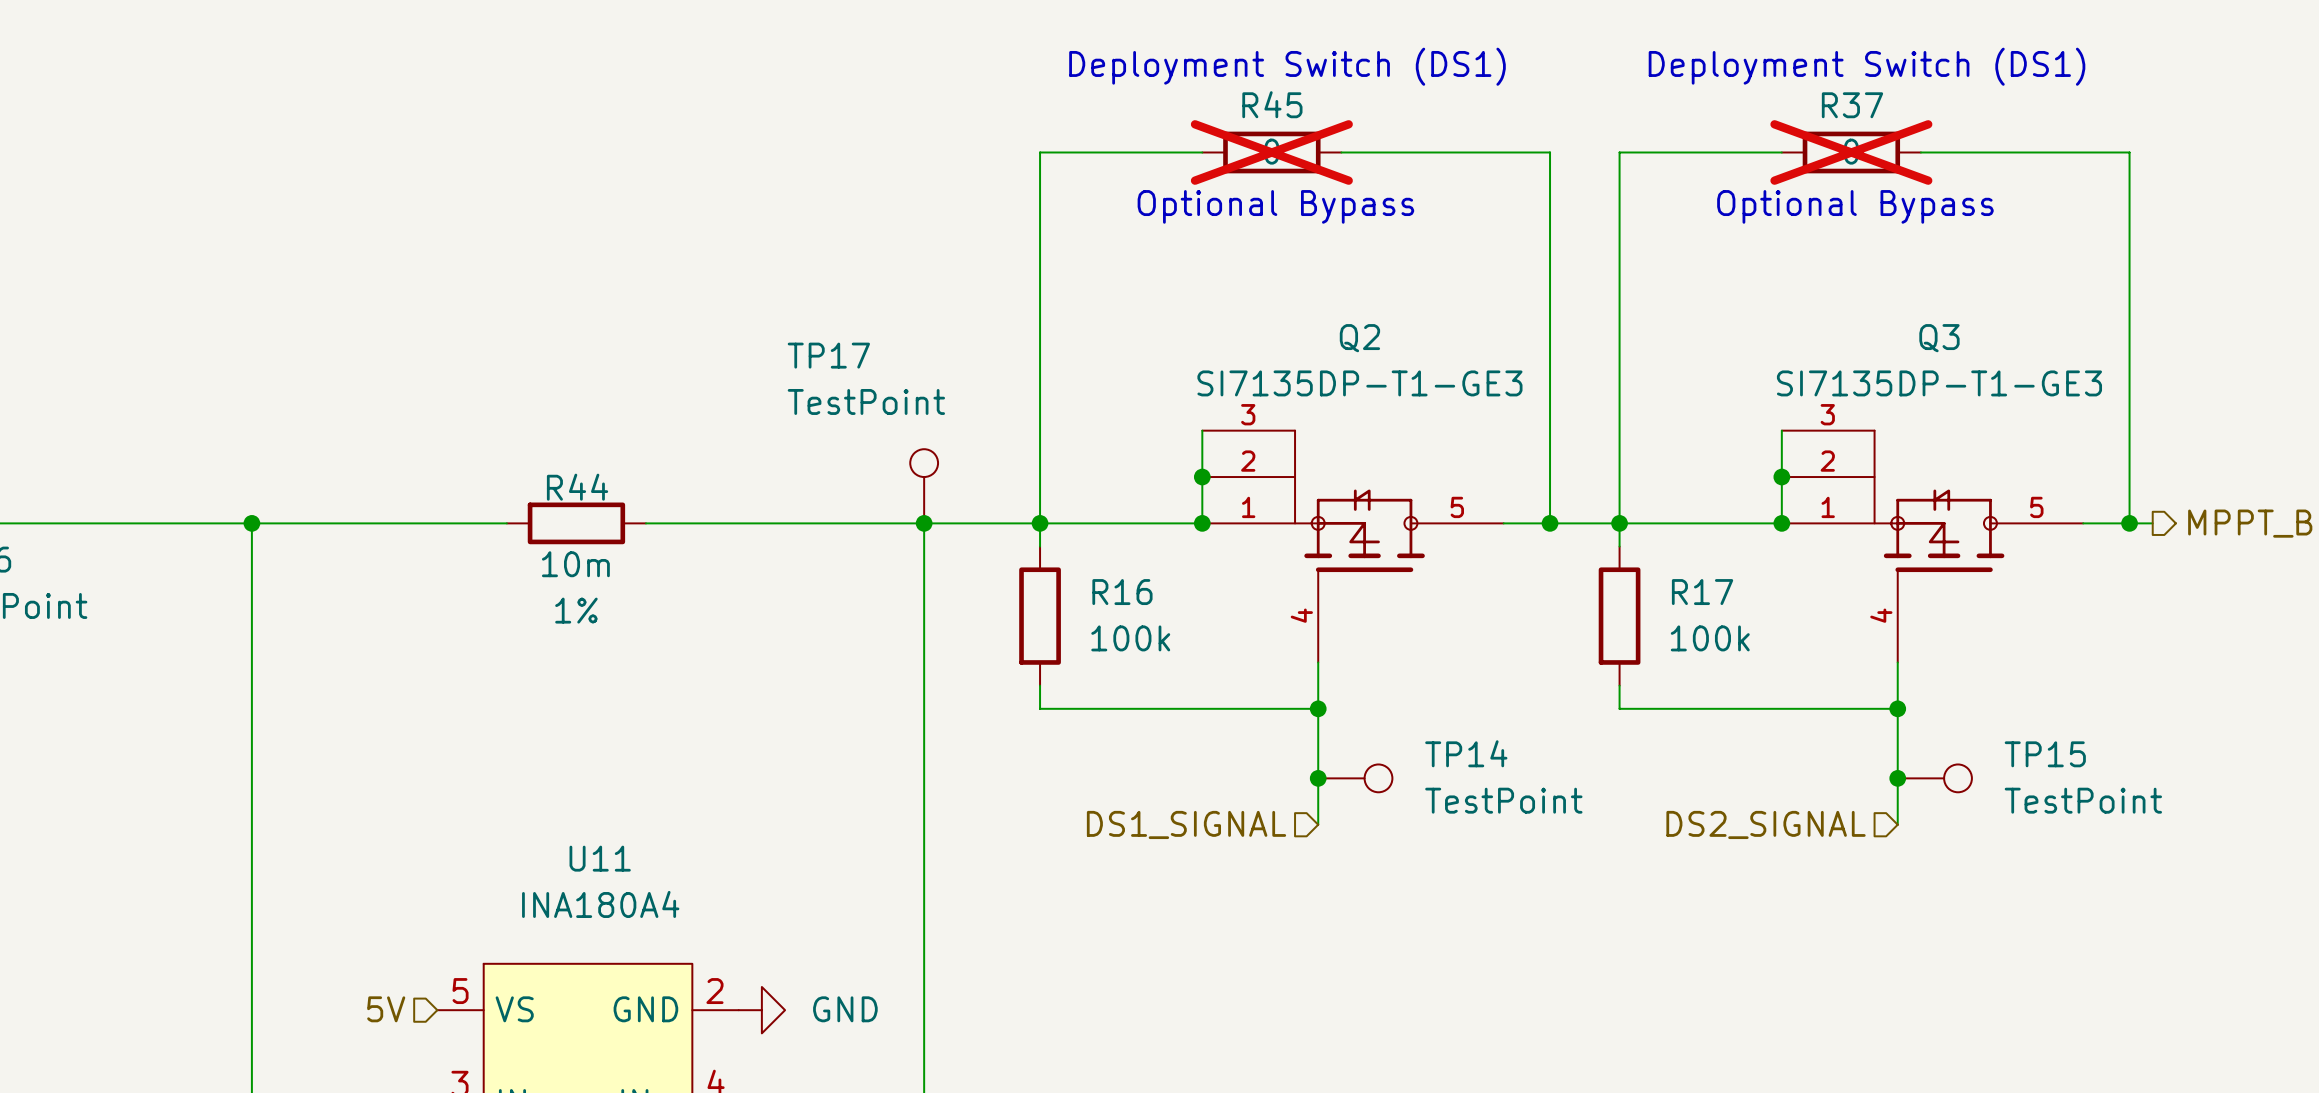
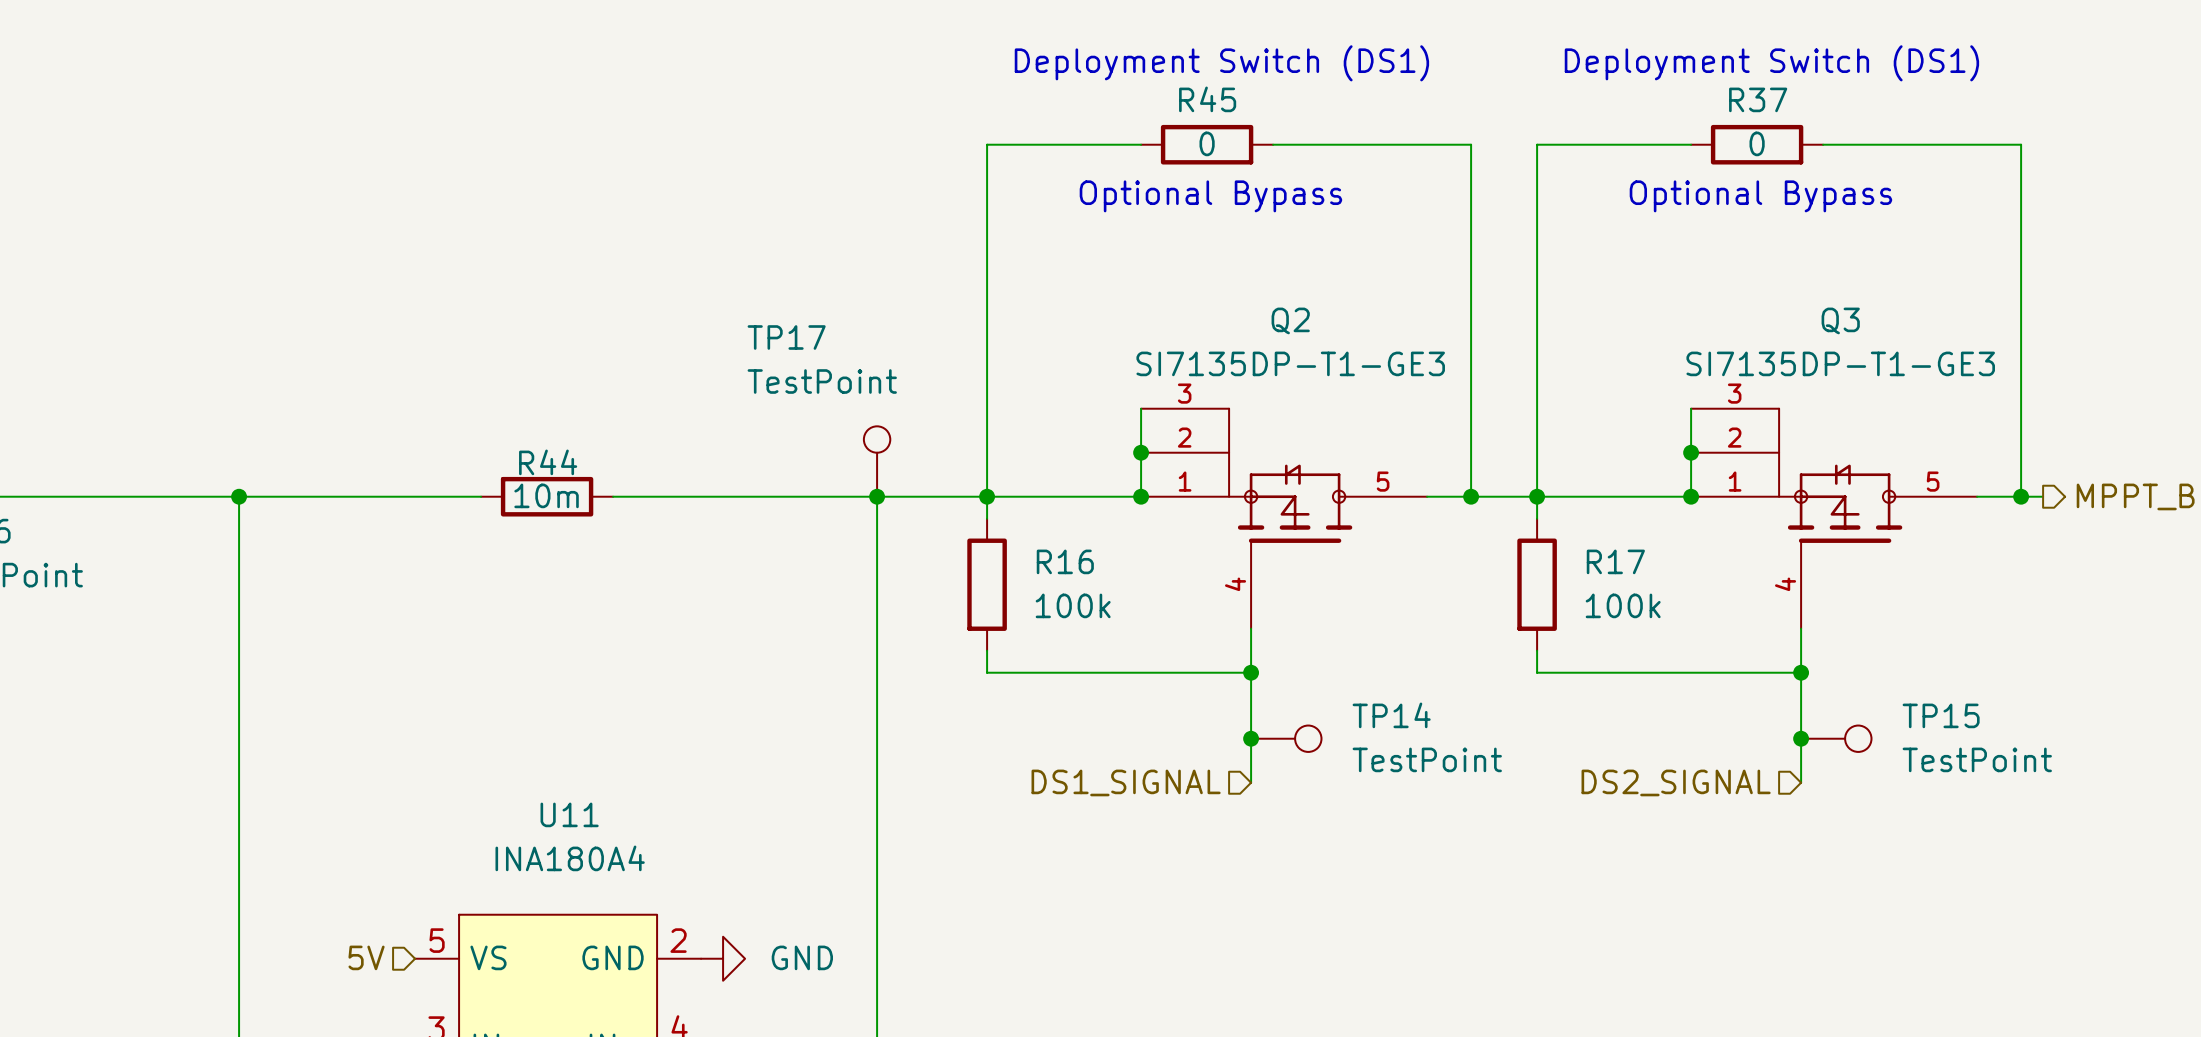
R45 do-not-place cross: (1271, 152) -> none
R37 do-not-place cross: (1851, 152) -> none
R44 value position: 10m (575, 564) -> 10m (546, 495)
R44 text: 1% (576, 610) -> none

